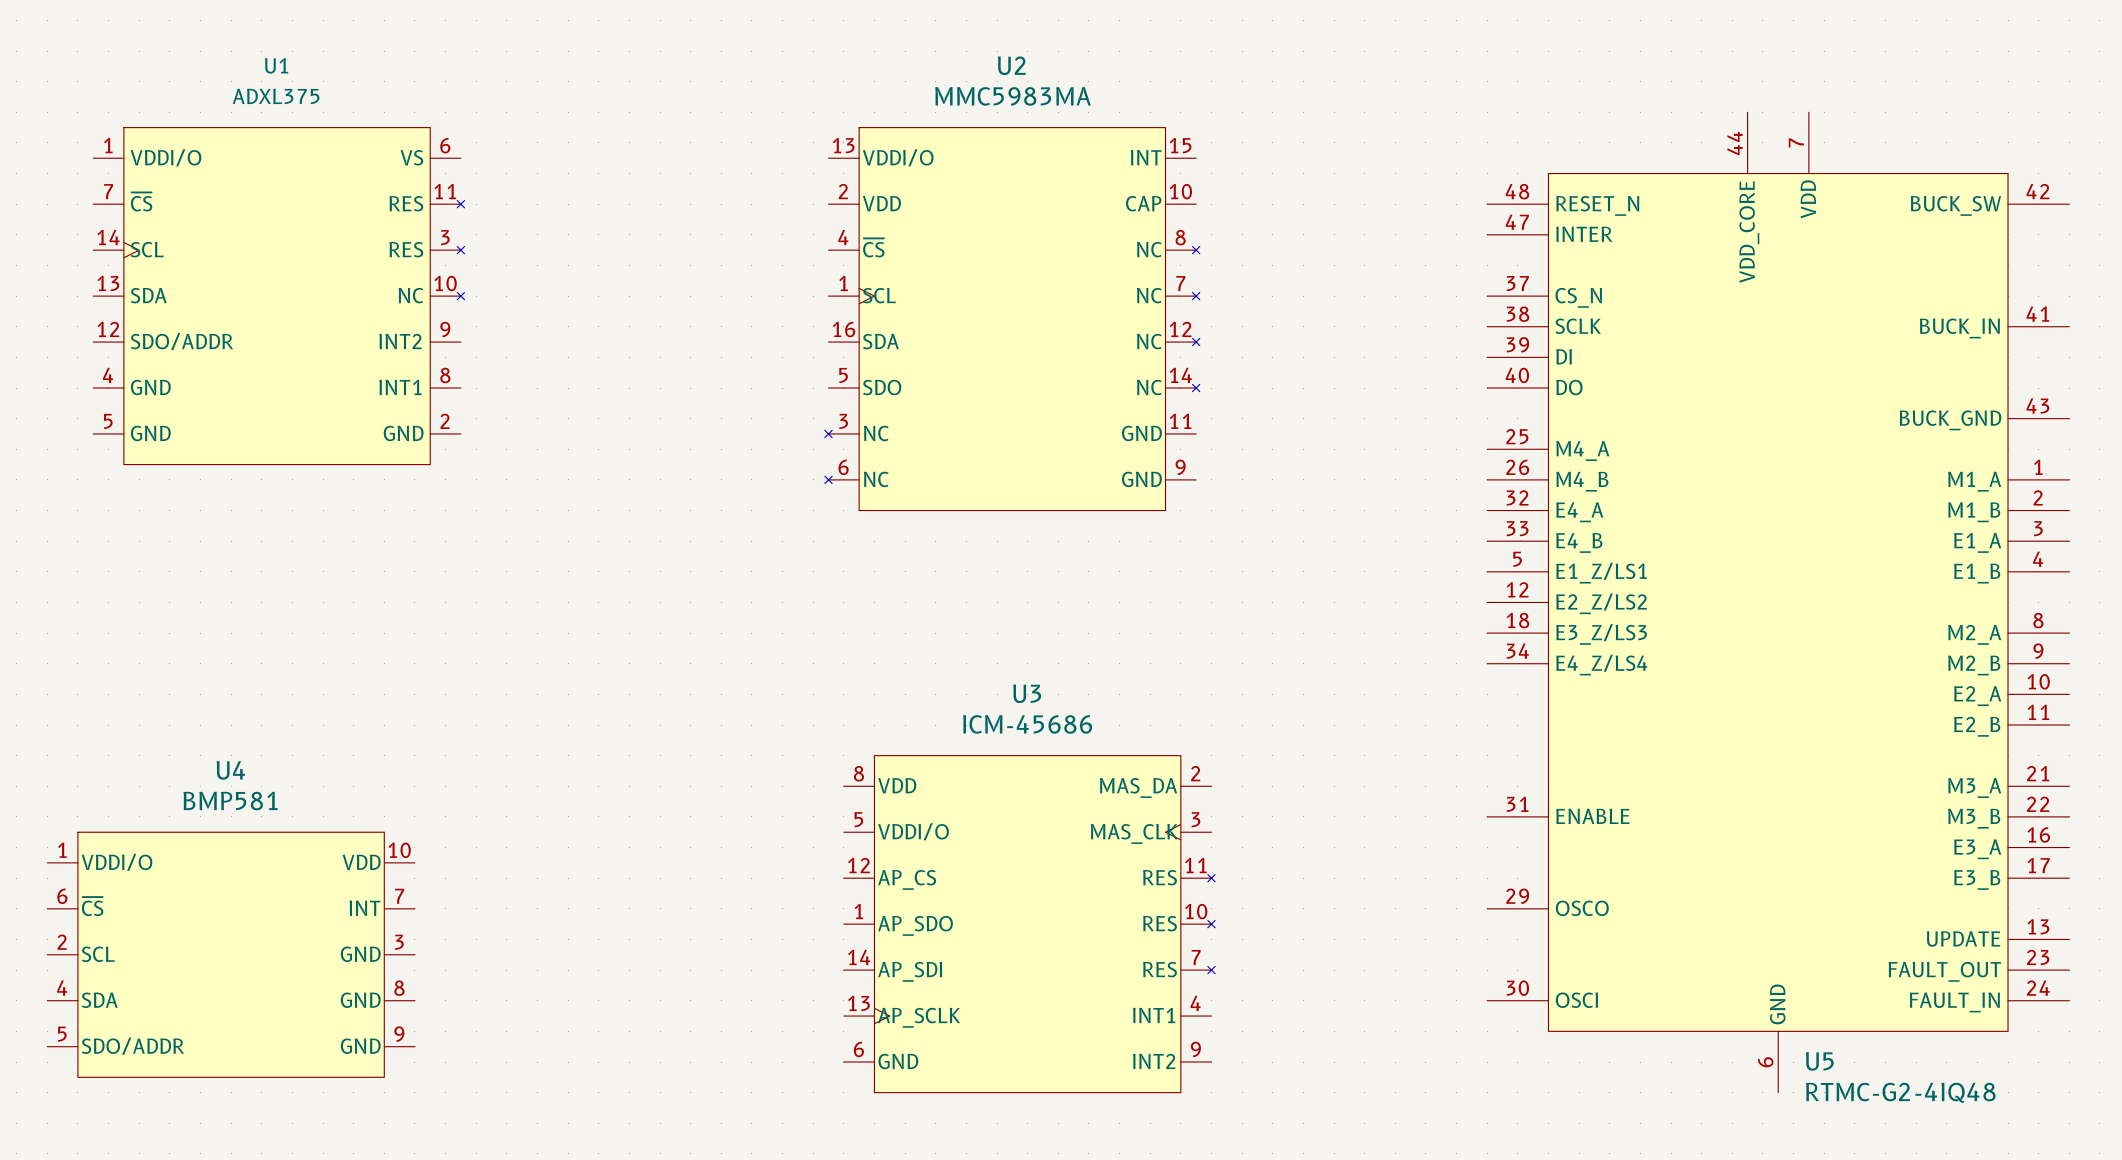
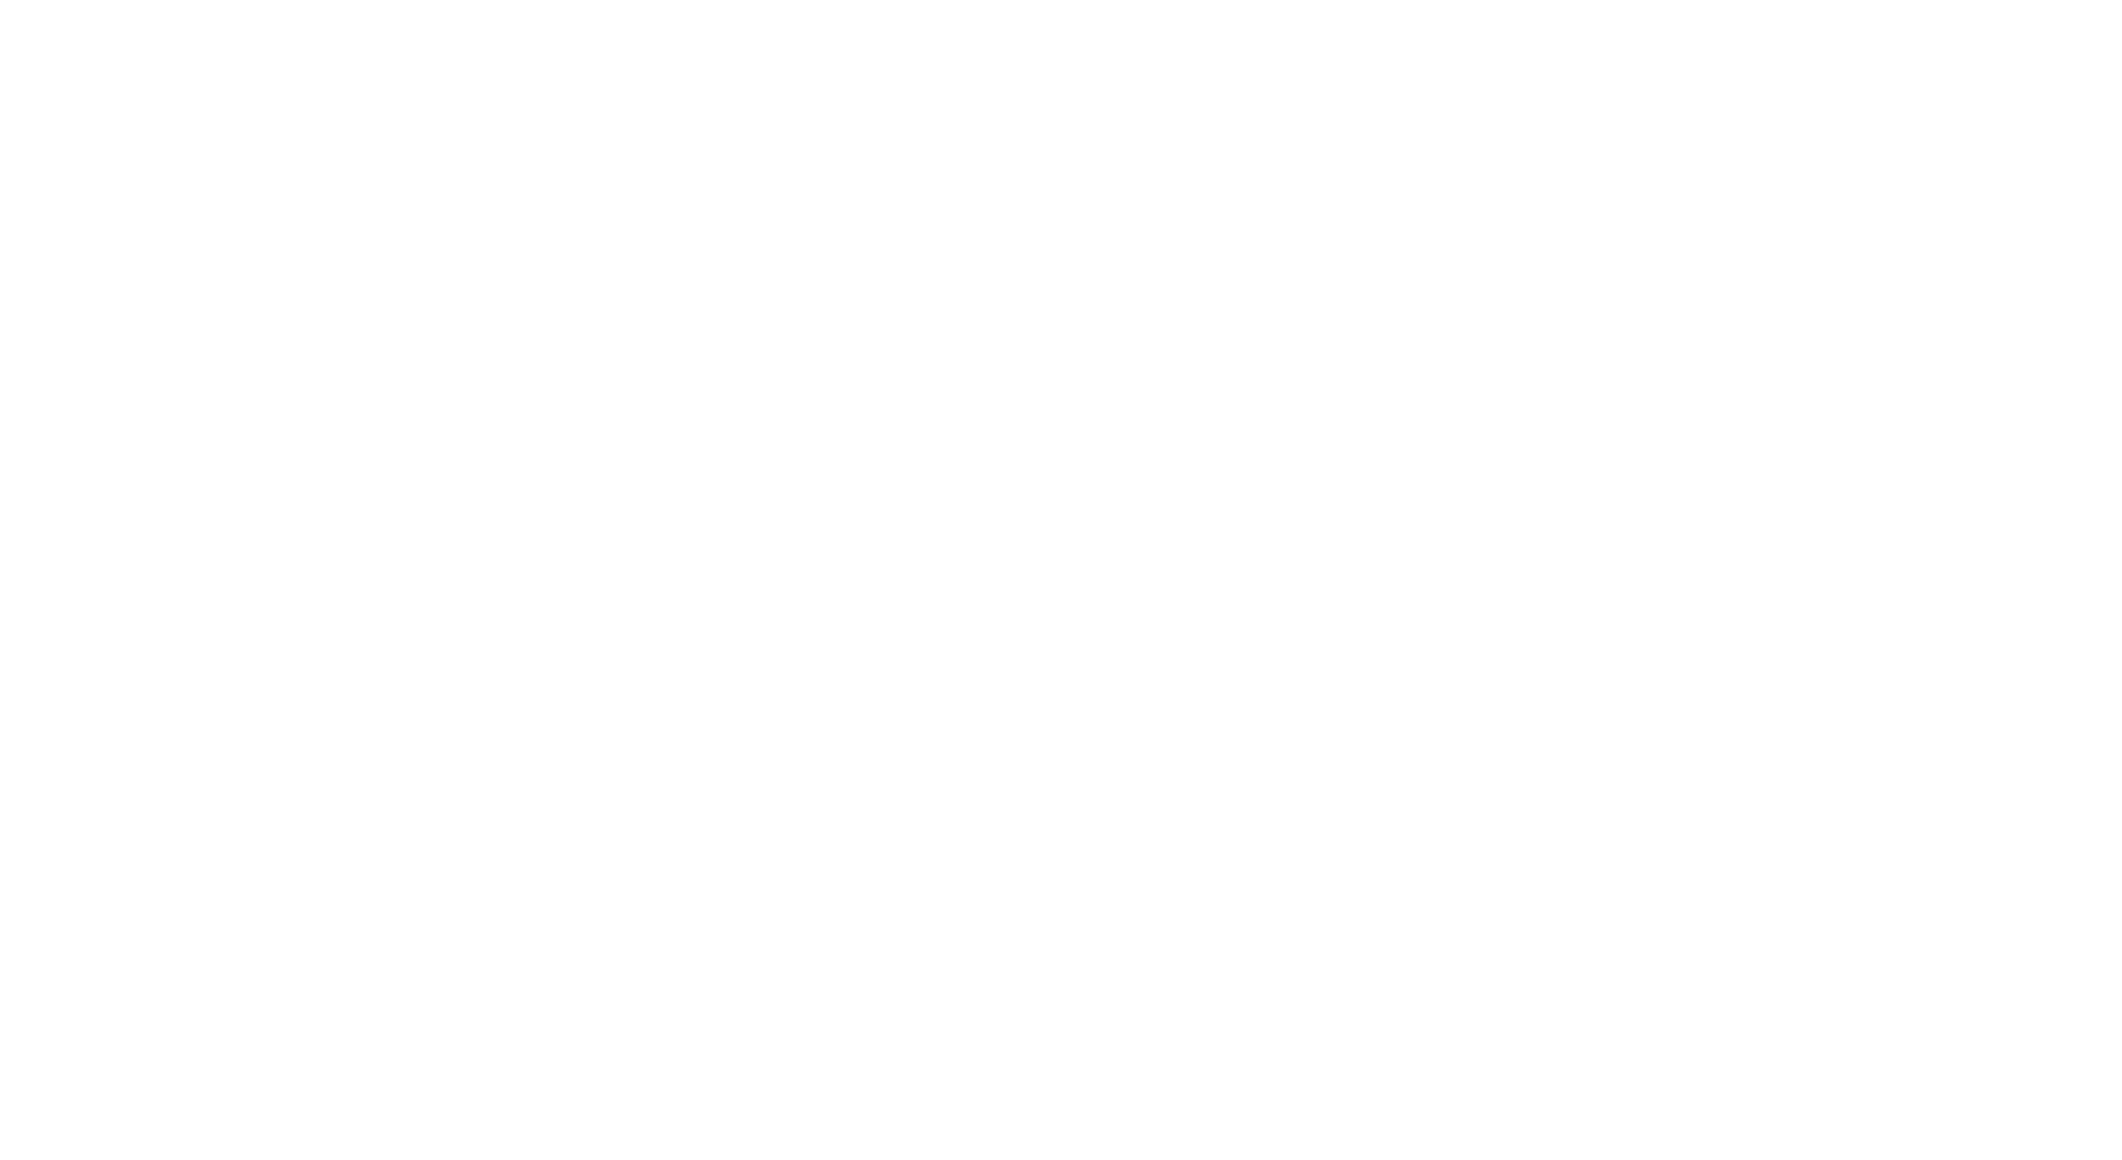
U1: ADXL375 (278, 296) -> none
U2: MMC5983MA (1012, 319) -> none
U5: RTMC-G2-4IQ48 (1778, 602) -> none
U3: ICM-45686 (1029, 924) -> none
U4: BMP581 (231, 954) -> none

